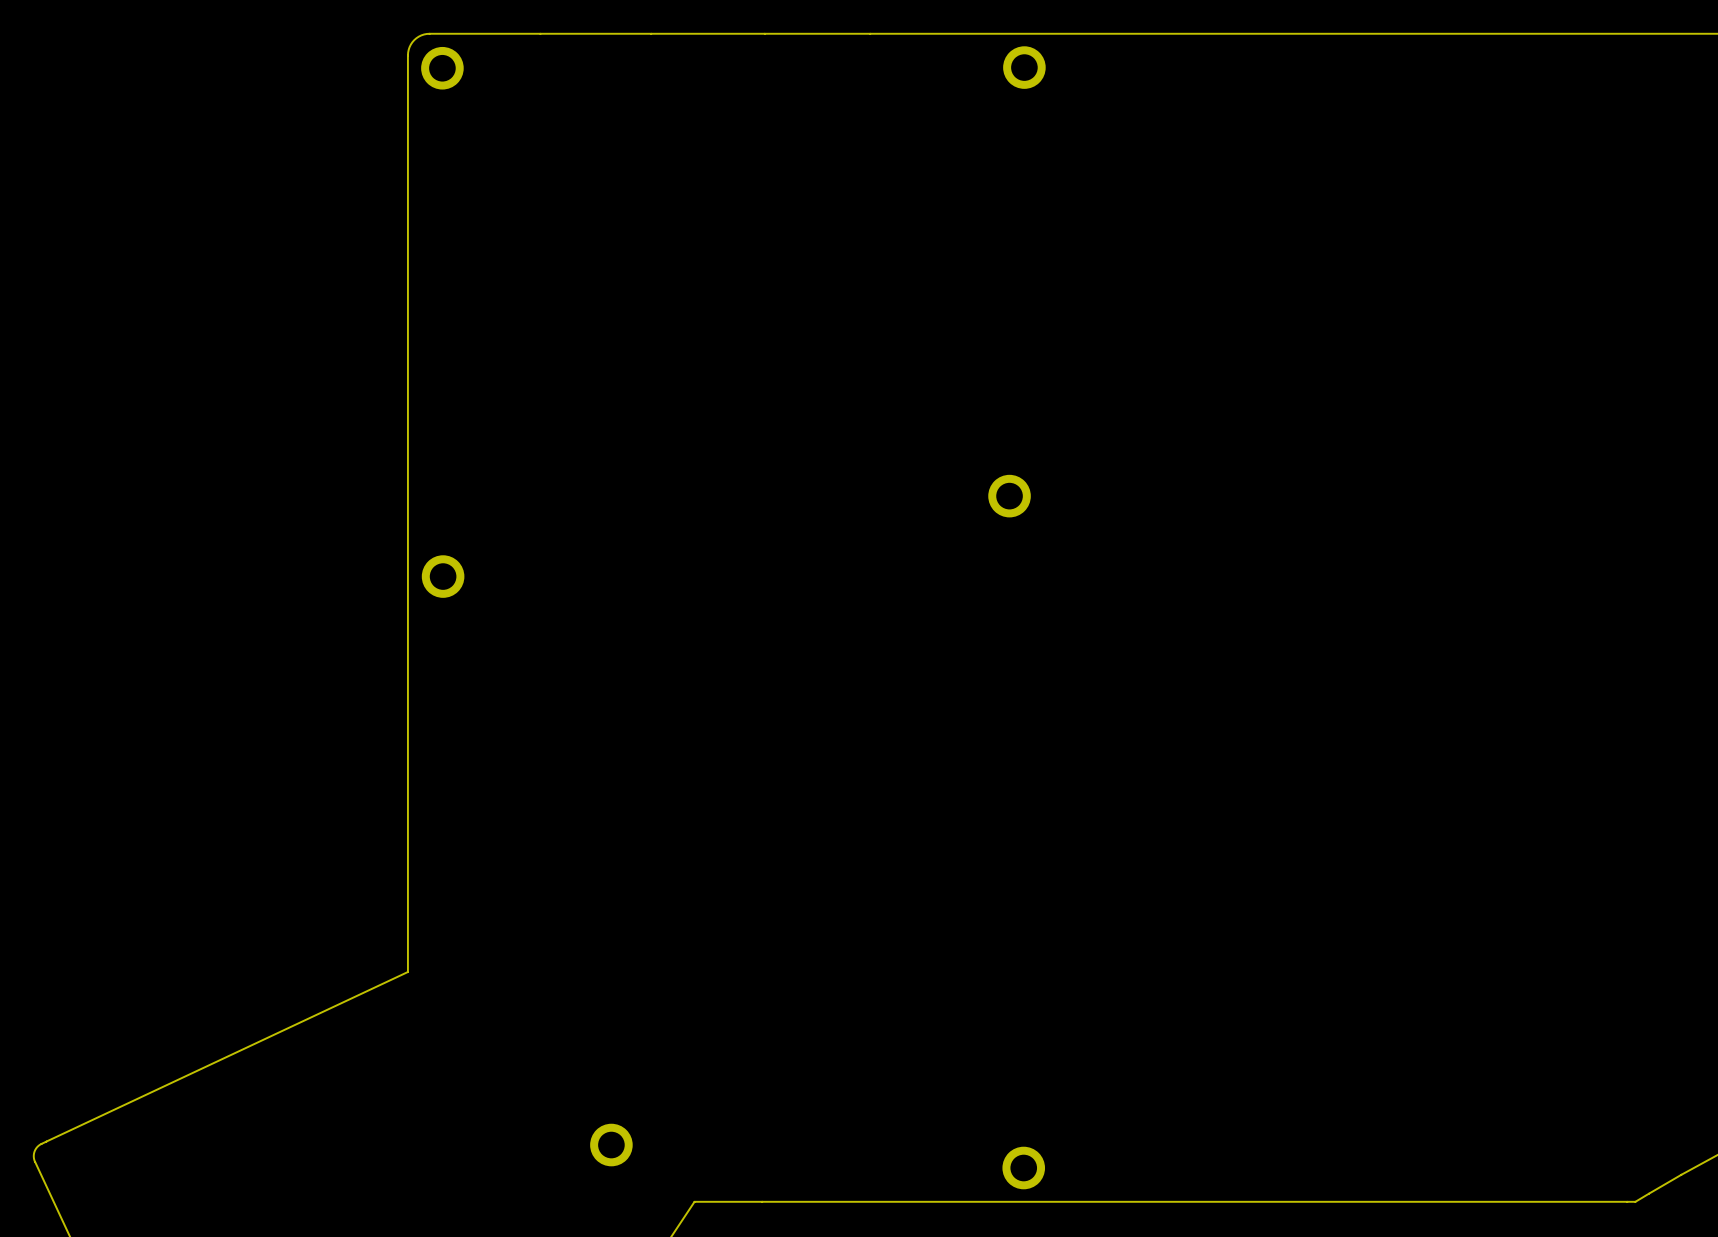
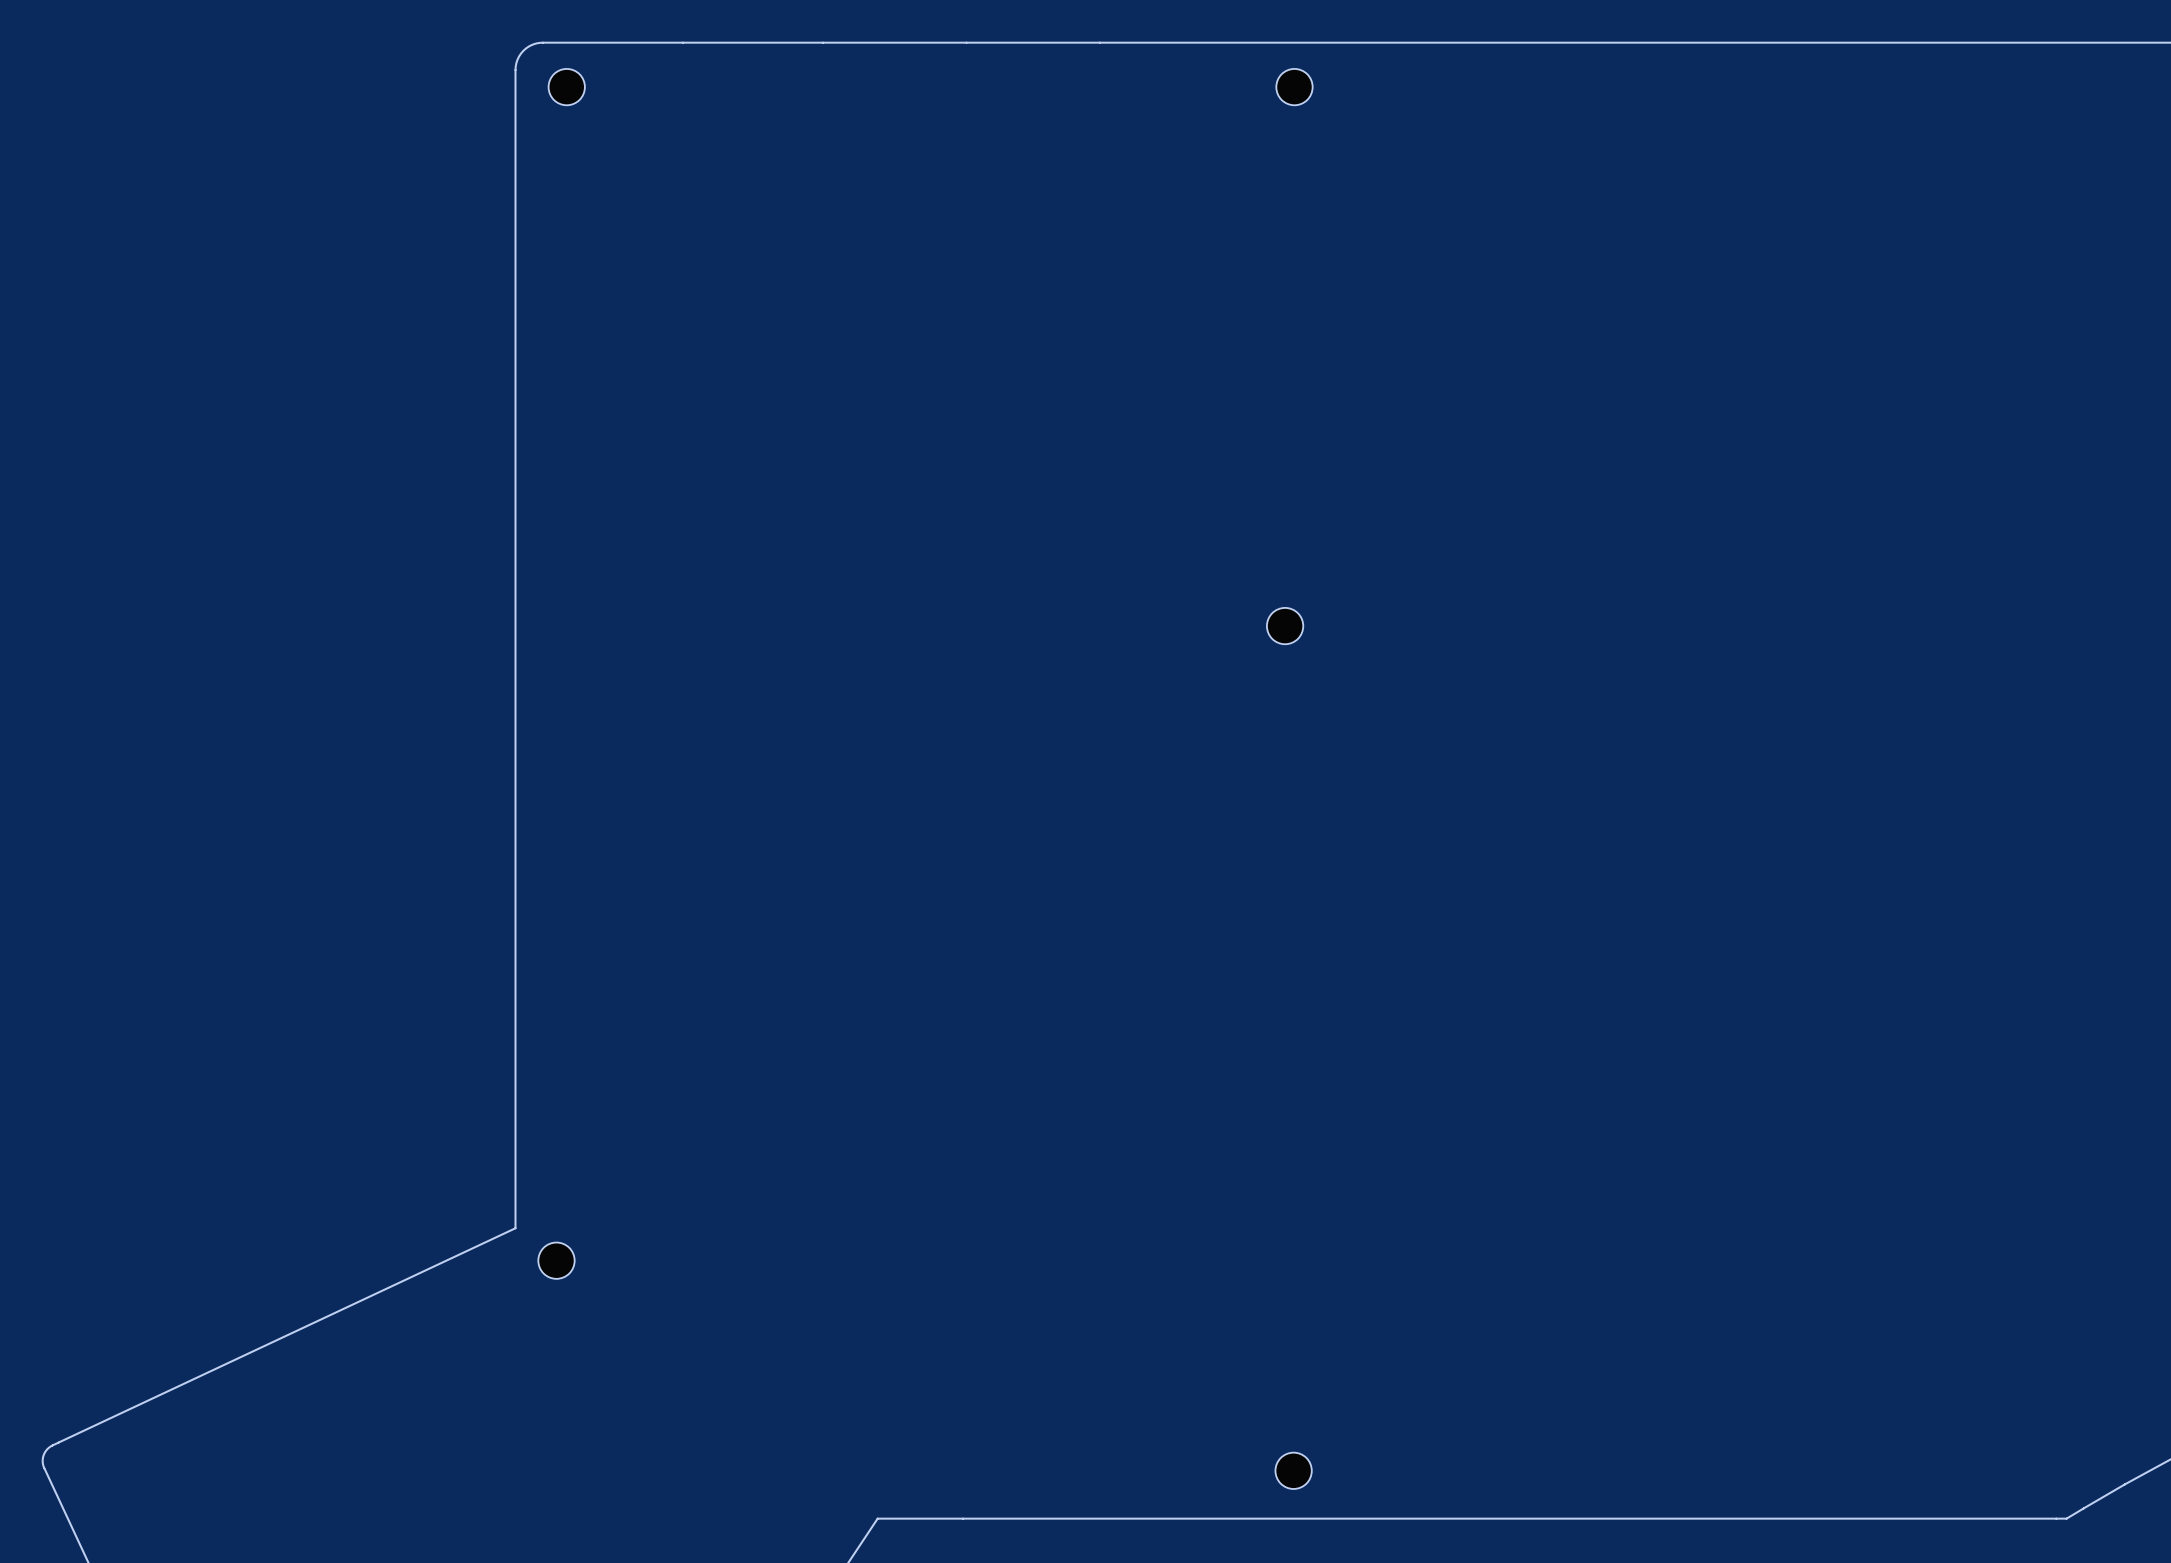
part footprint: [421, 46, 464, 90] -> [548, 68, 585, 106]
part footprint: [1003, 46, 1046, 89] -> [1276, 68, 1313, 106]
part footprint: [988, 474, 1031, 518] -> [1266, 607, 1304, 645]
part: (443, 576) -> none
part: none -> (556, 1260)
part: (611, 1145) -> none
part footprint: [1002, 1146, 1046, 1190] -> [1275, 1452, 1312, 1489]

